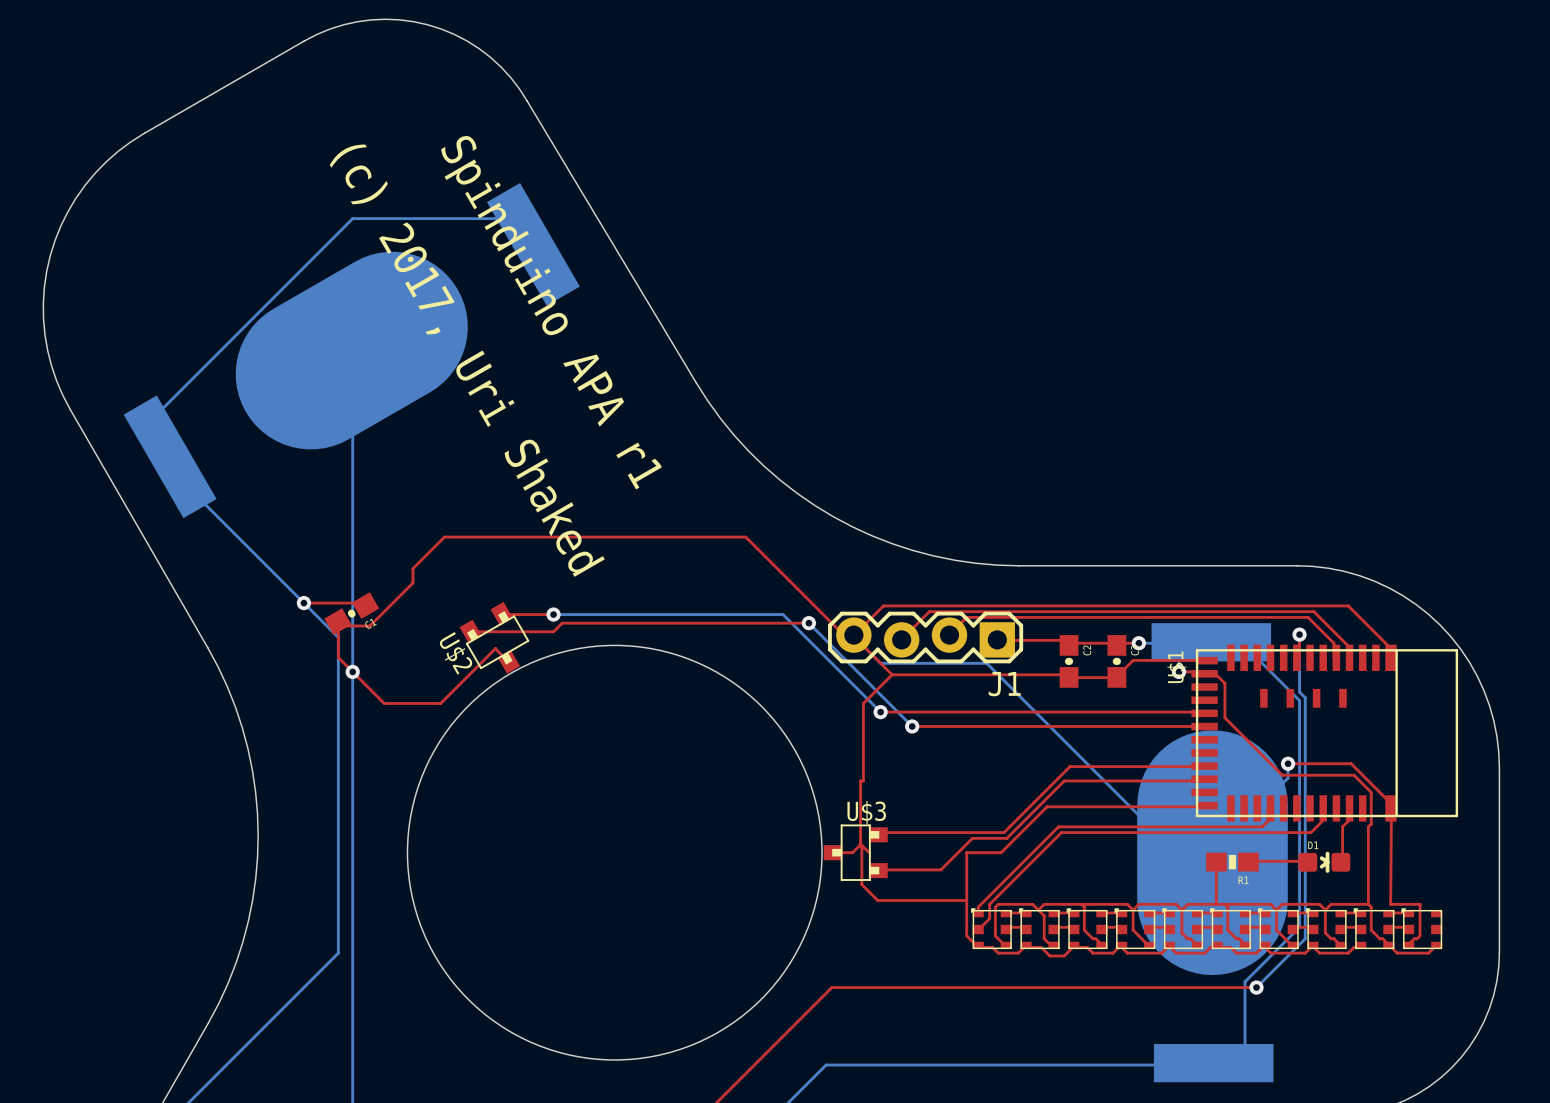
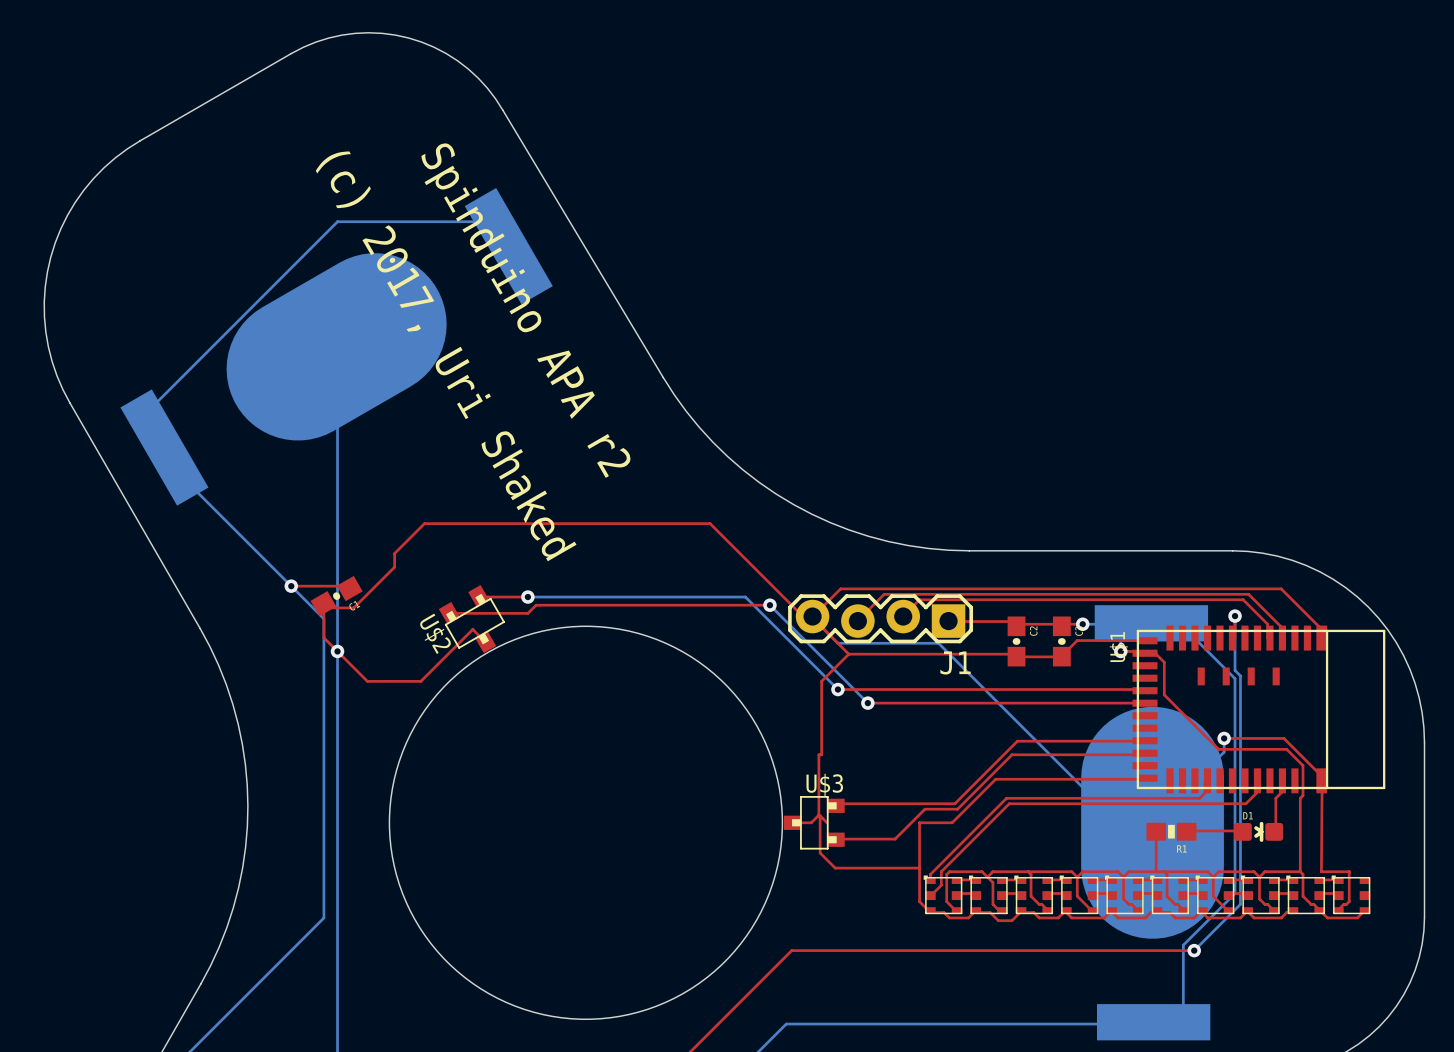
text: Spinduino APA r1 (551, 312) -> Spinduino APA r2 (526, 310)

